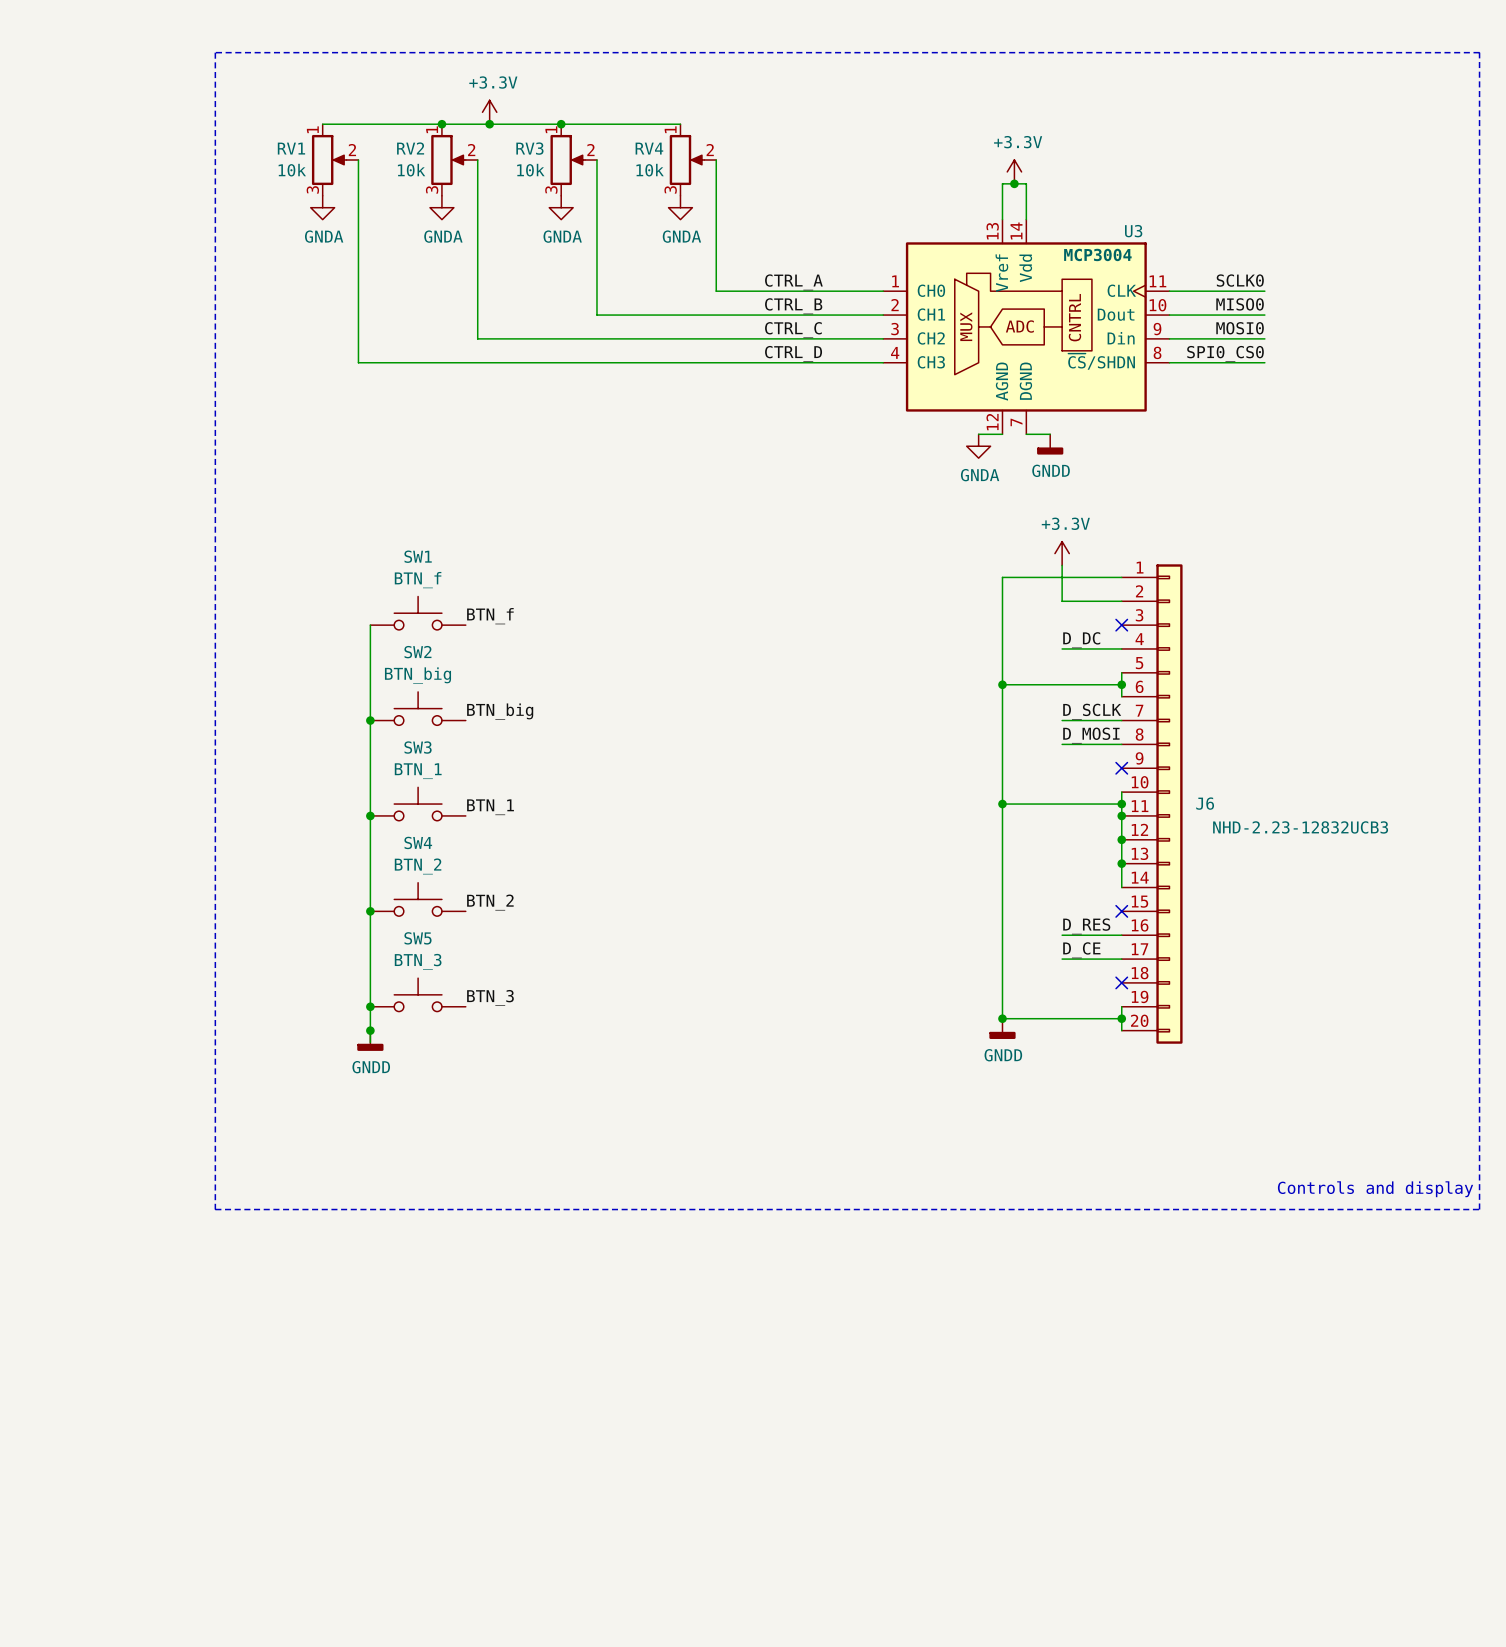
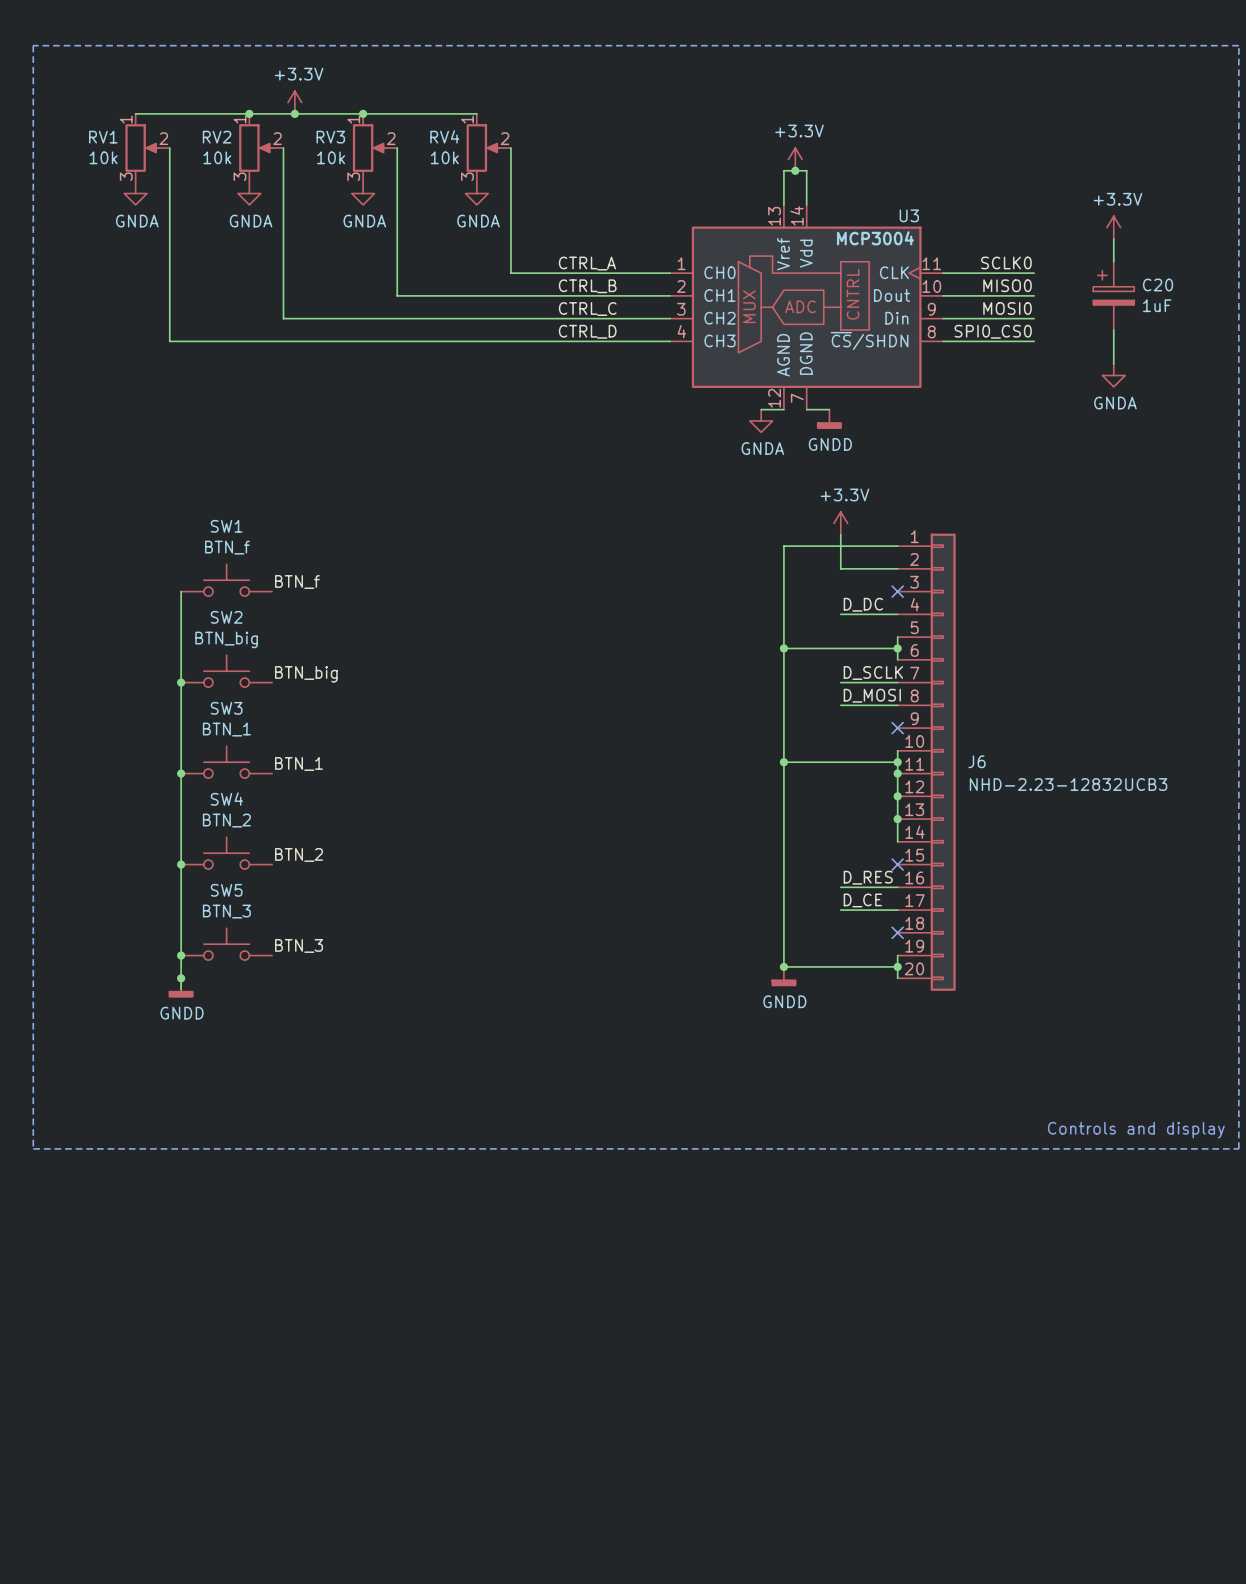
power symbol: none -> +3.3V (1113, 227)
wire: none -> (1113, 239) (1113, 261)
C20: none -> 1uF (1113, 295)
wire: none -> (1113, 330) (1113, 364)
power symbol: none -> GNDA (1113, 375)

